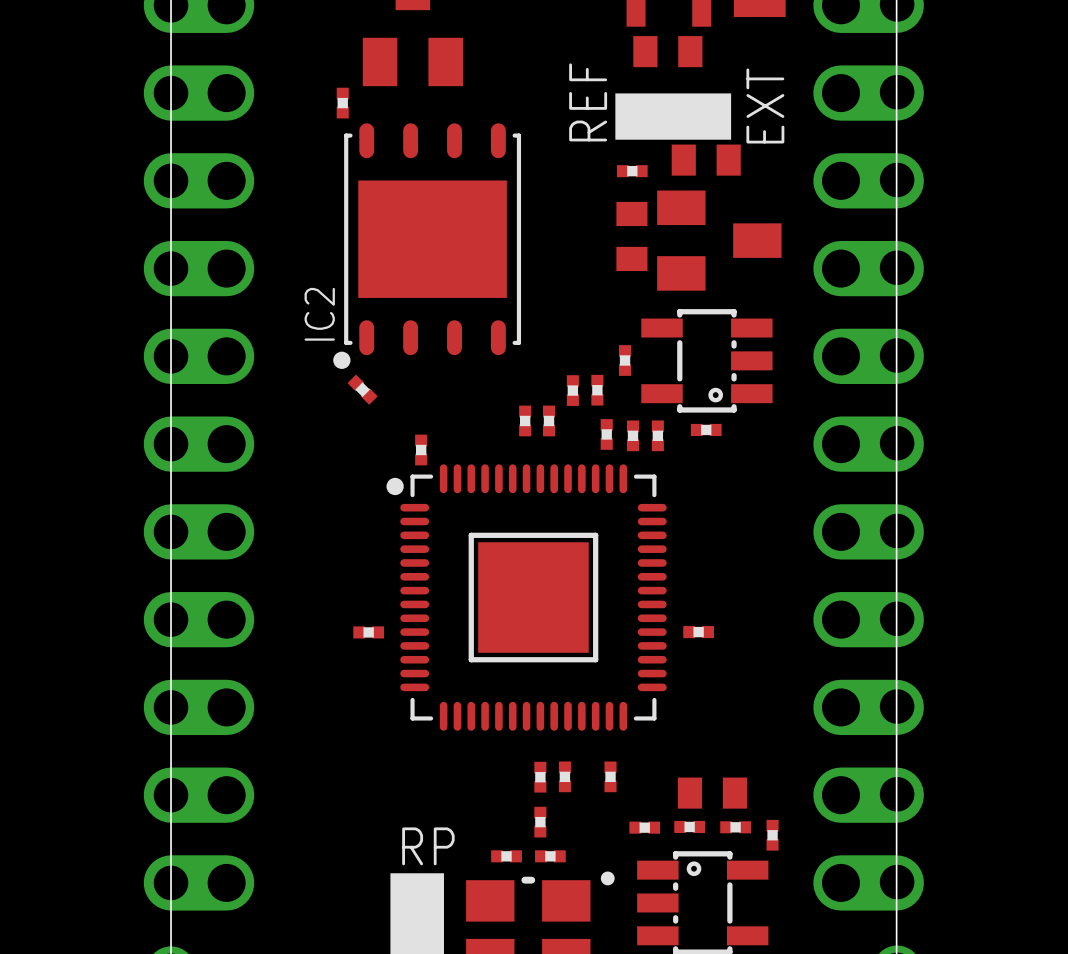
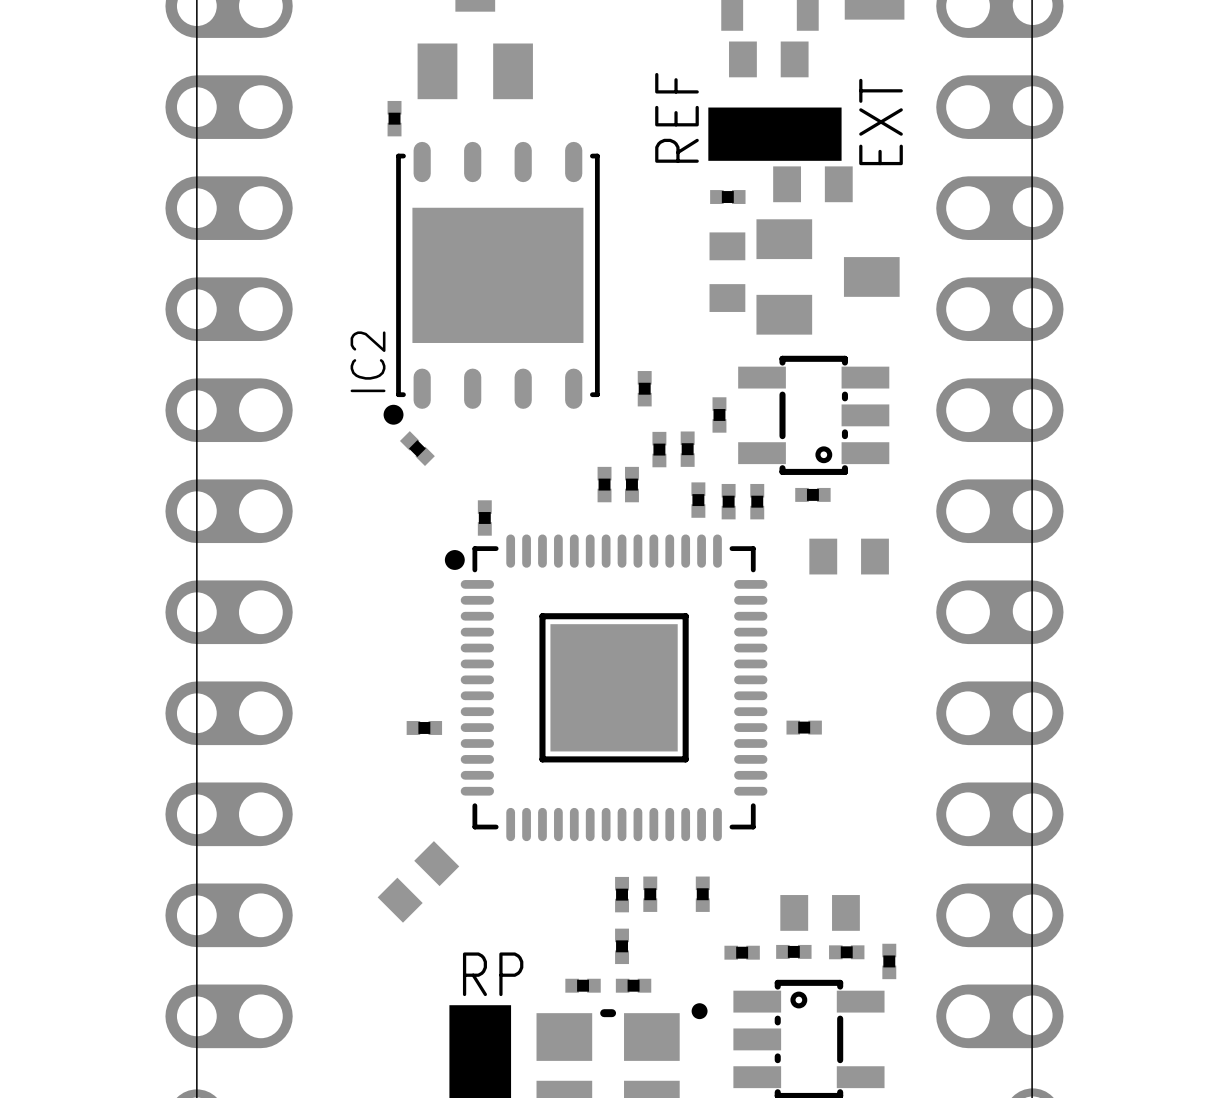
part: none -> (644, 388)
part: none -> (849, 556)
part: none -> (418, 881)

